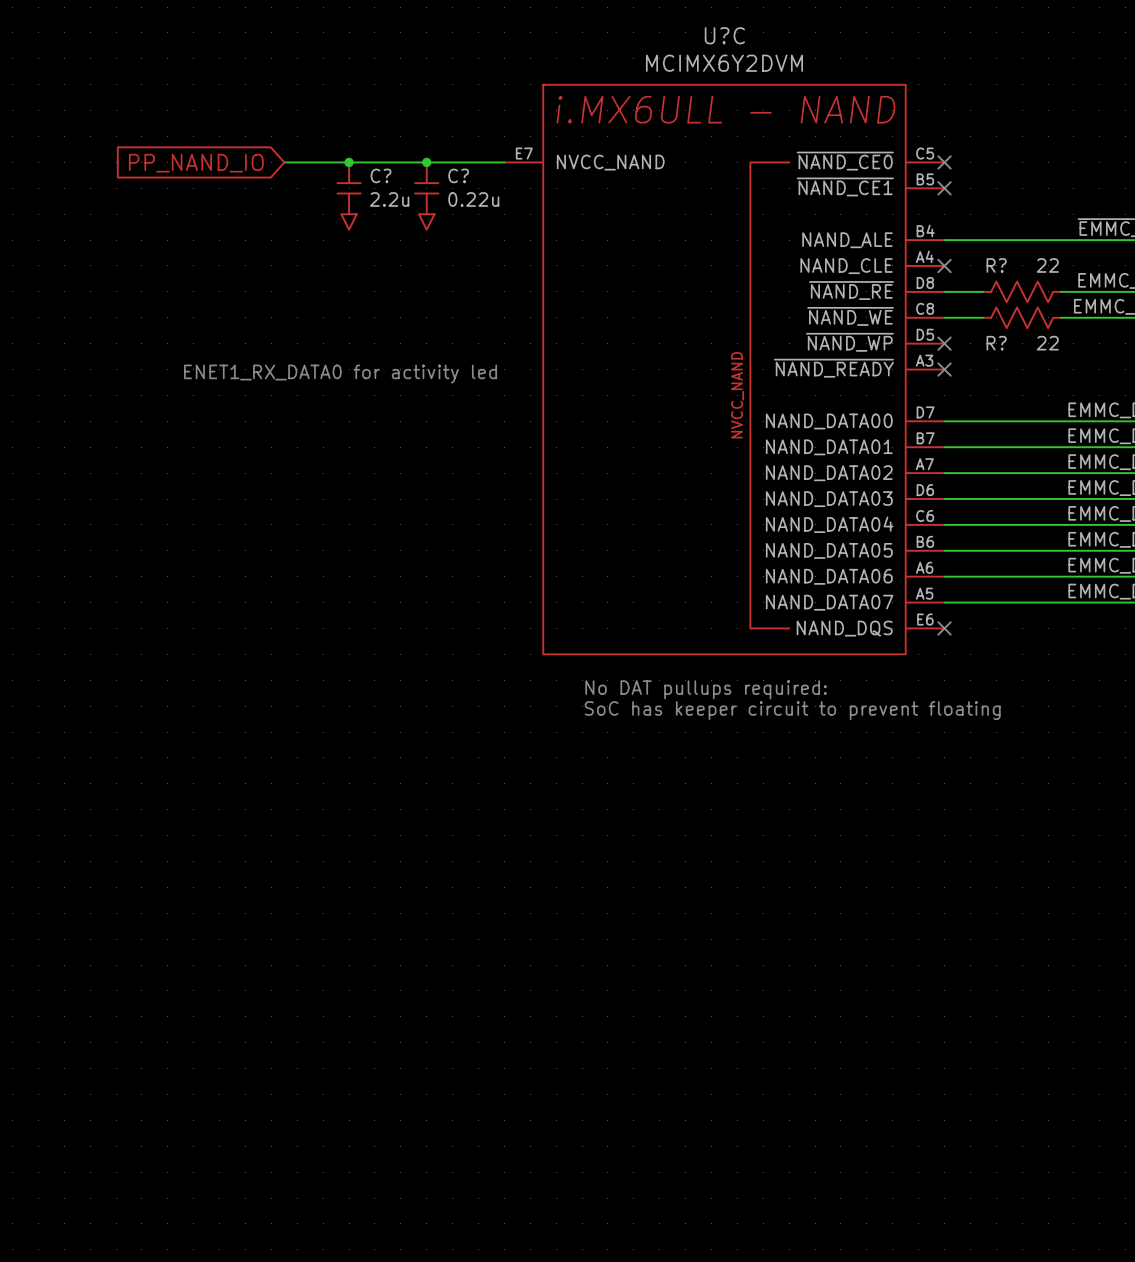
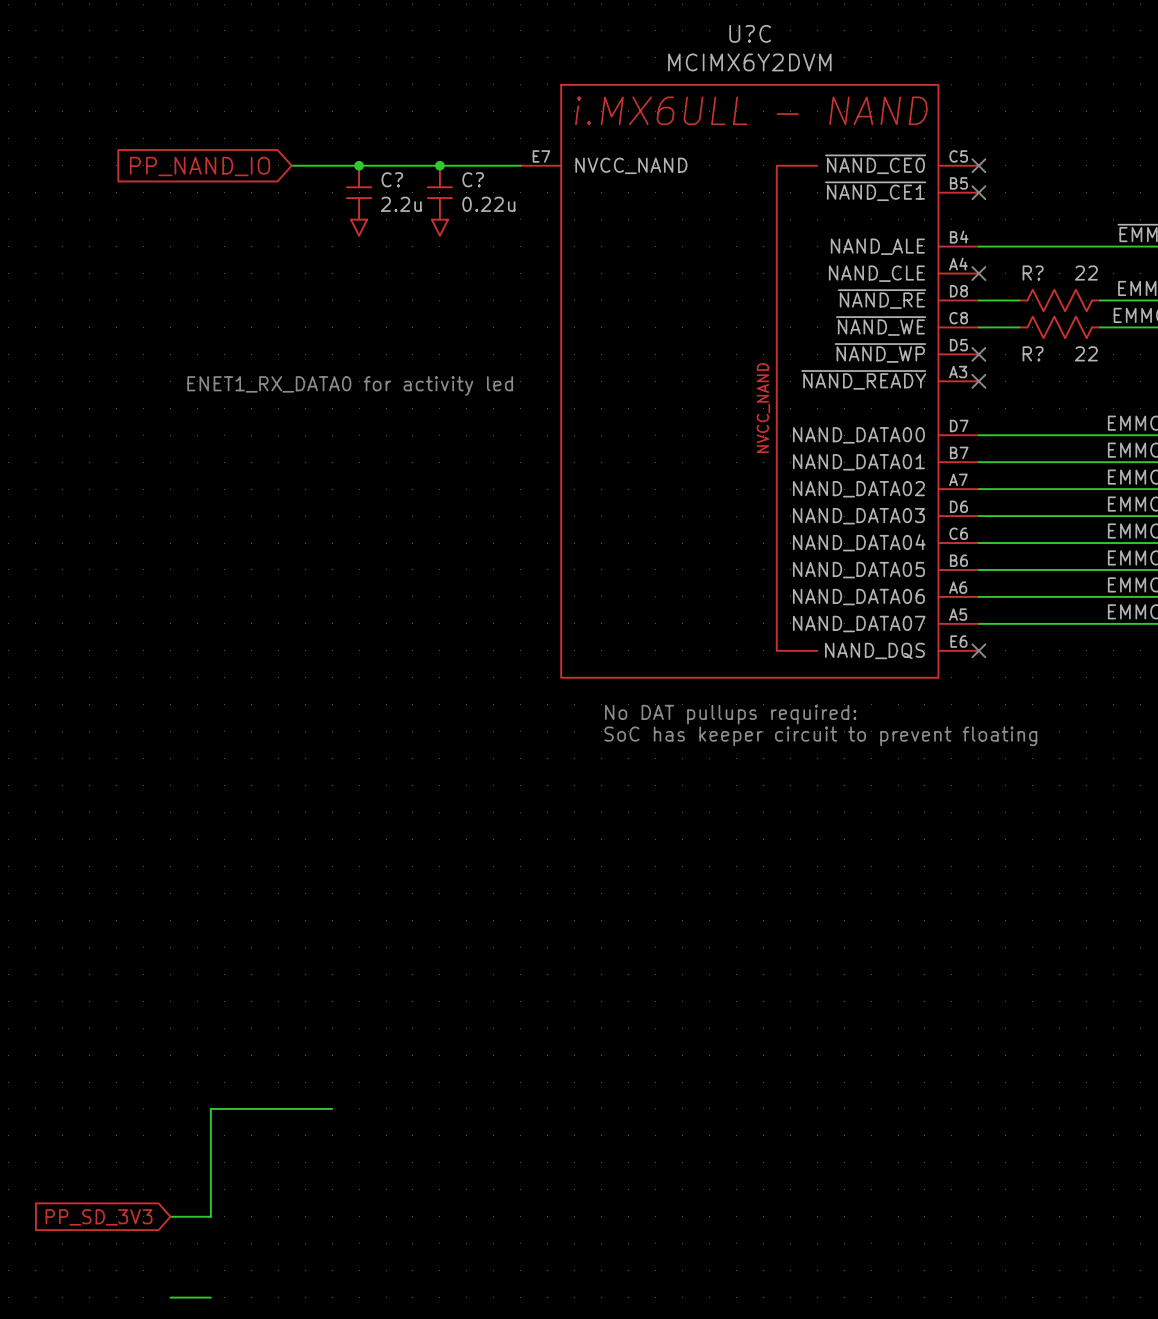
wire: none -> (332, 1108) (210, 1108) (210, 1216) (170, 1216)
global label: none -> PP_SD_3V3 (99, 1217)
wire: none -> (170, 1297) (210, 1297)

